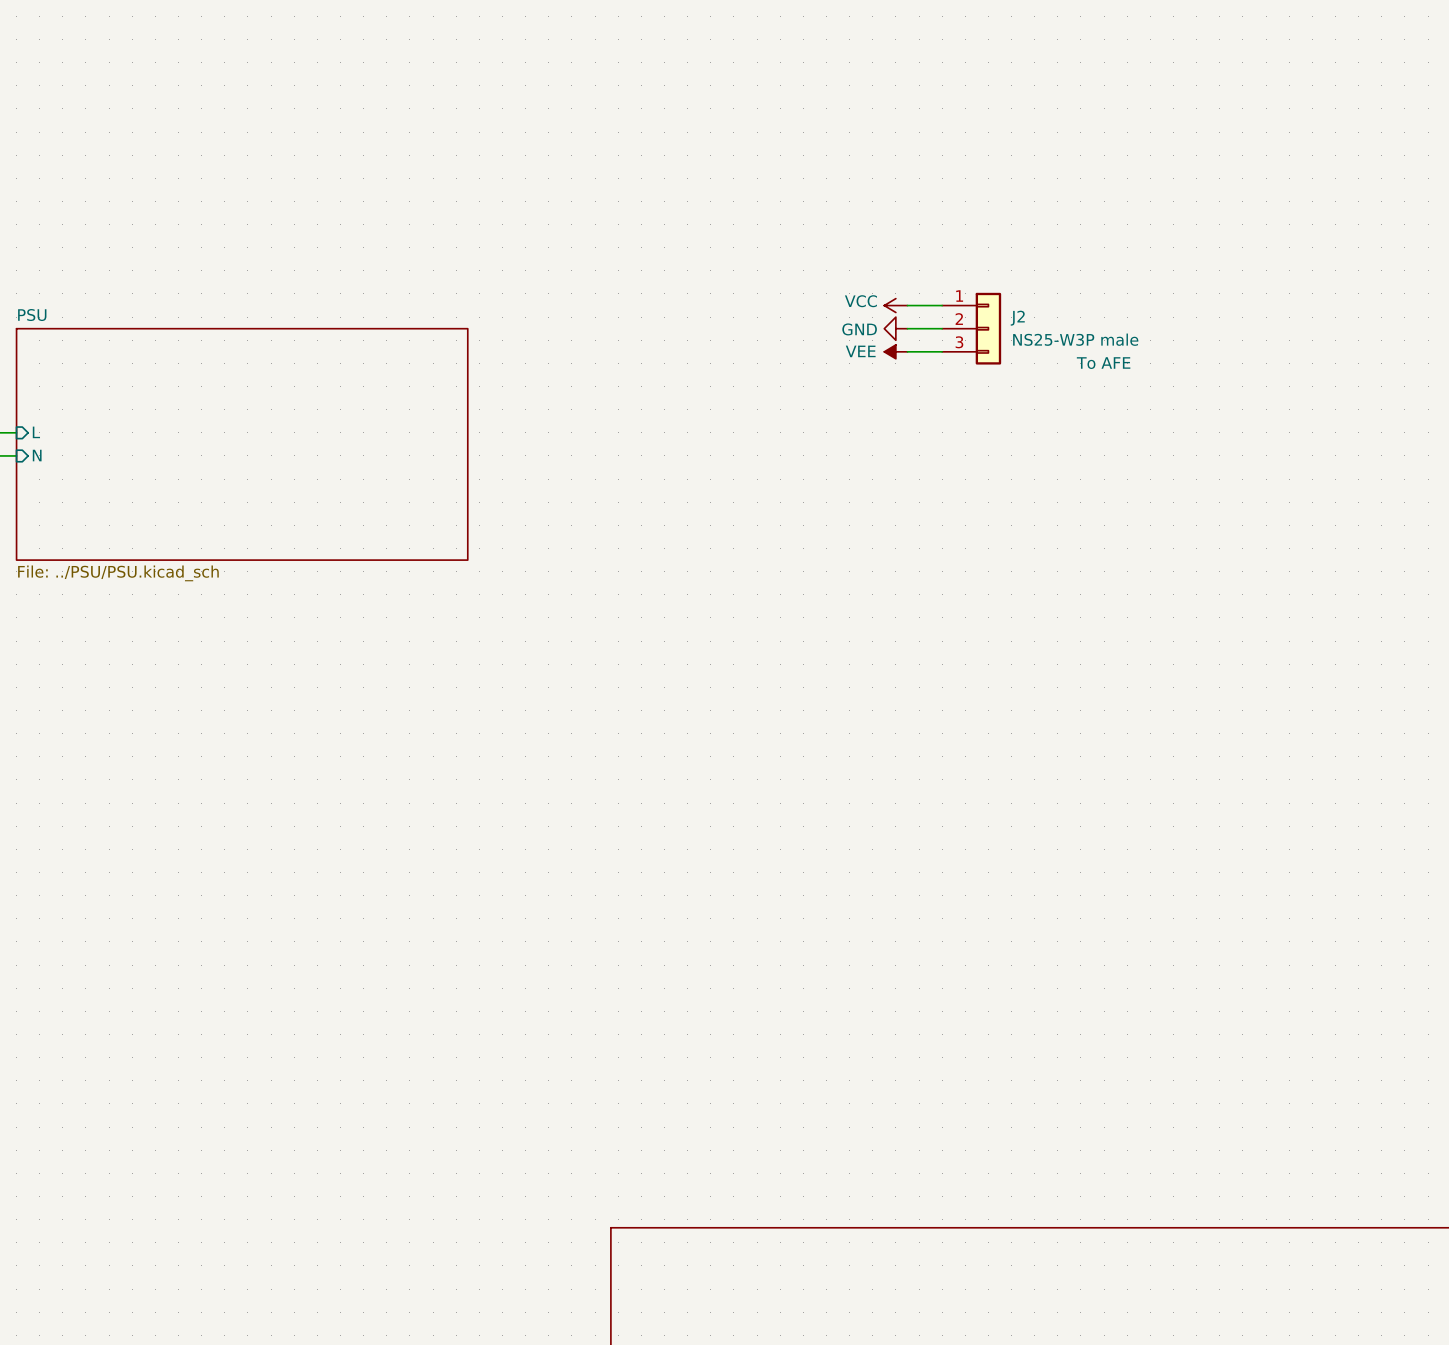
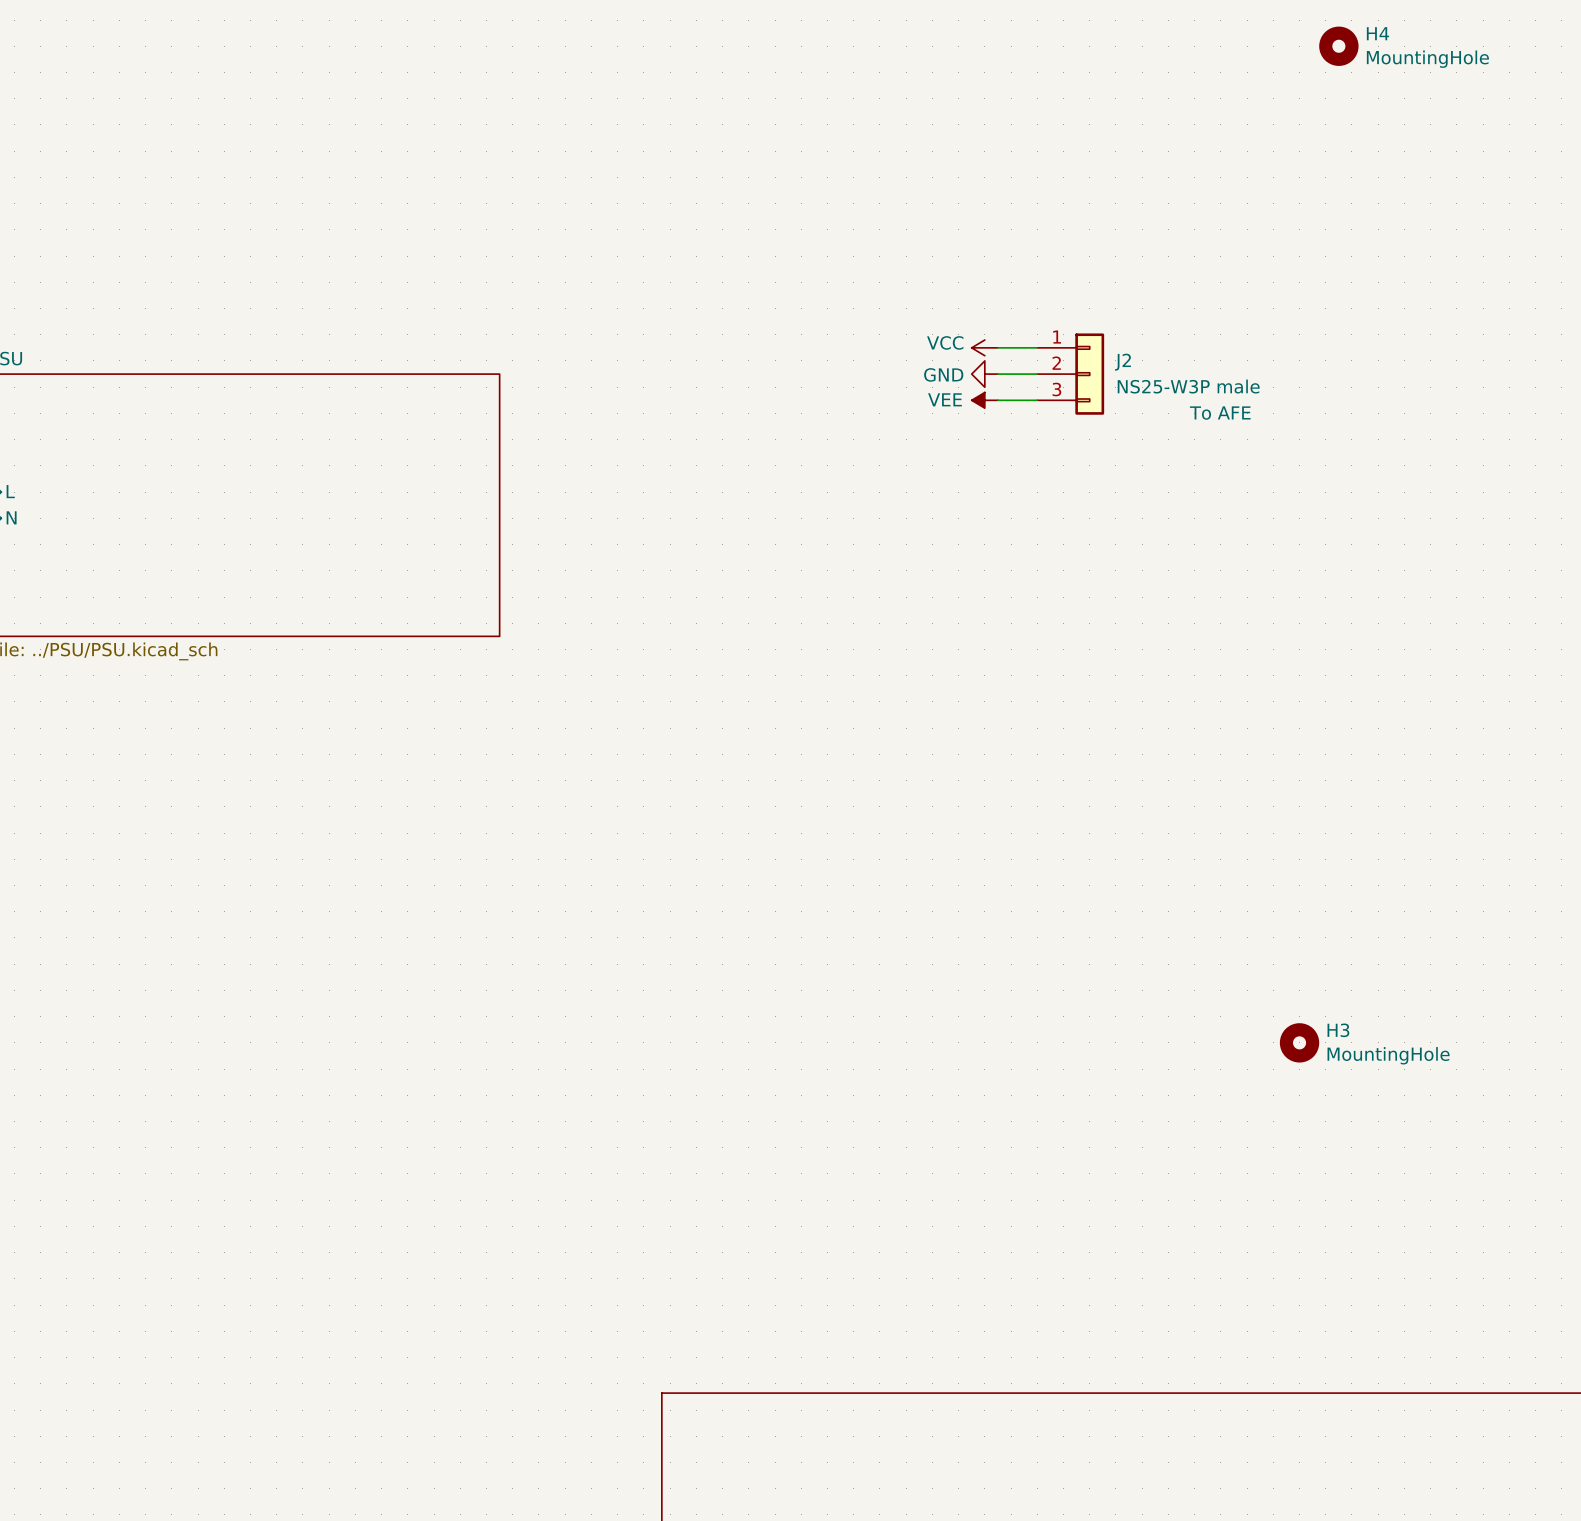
H4: none -> MountingHole (1338, 46)
H3: none -> MountingHole (1299, 1042)

